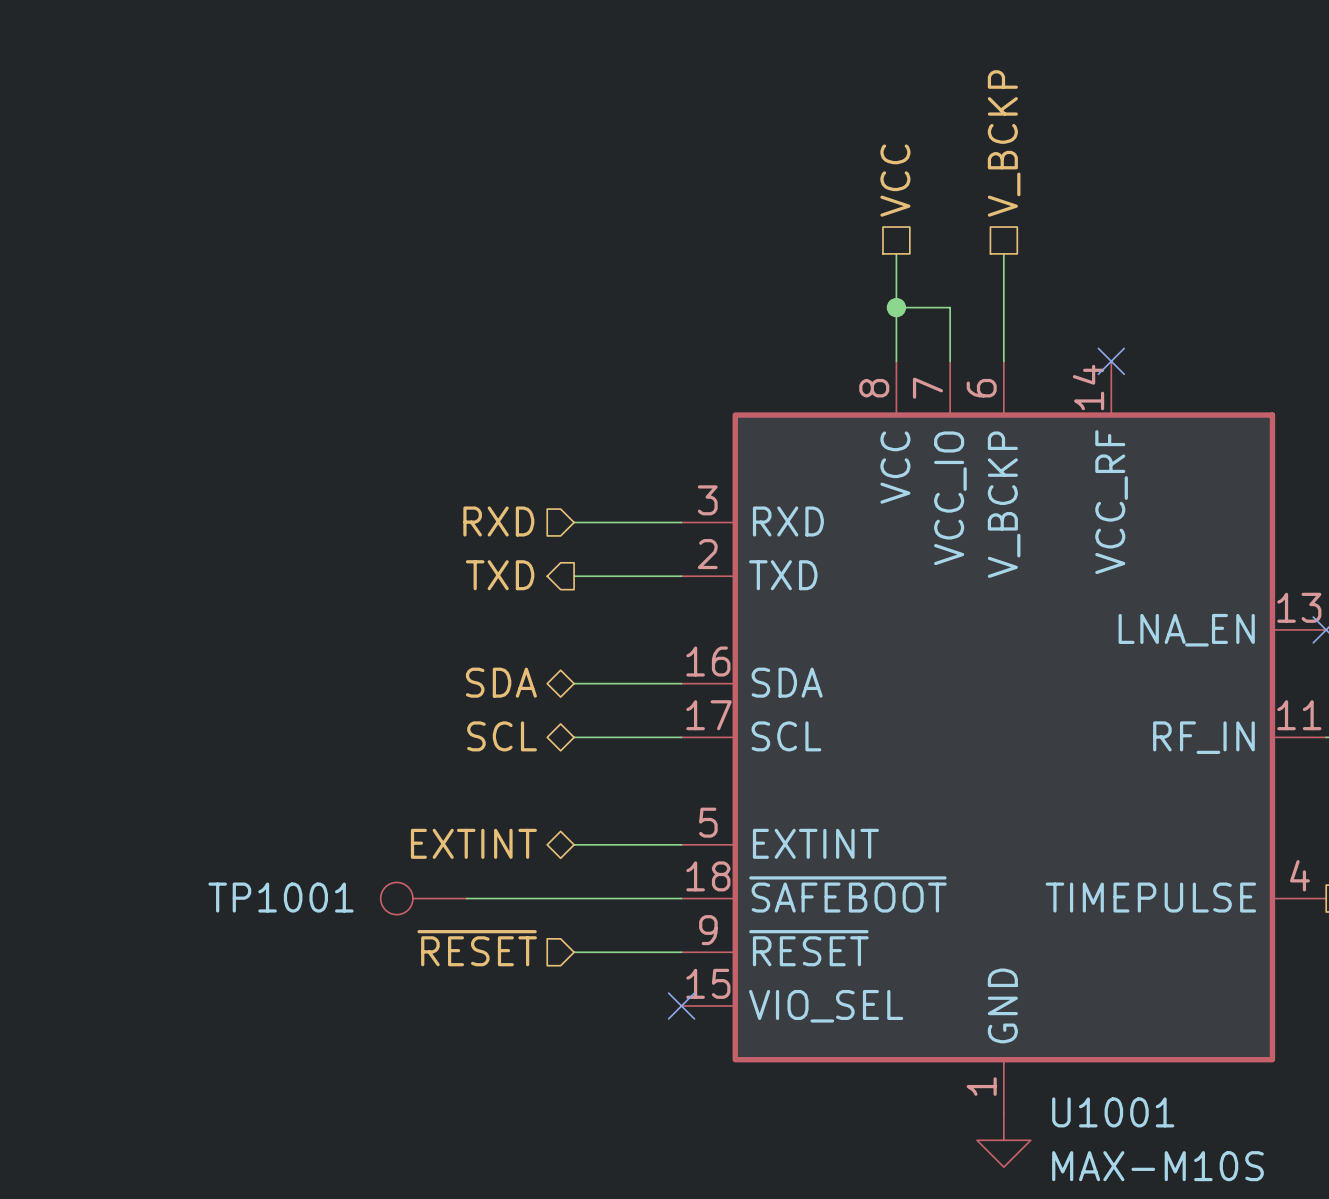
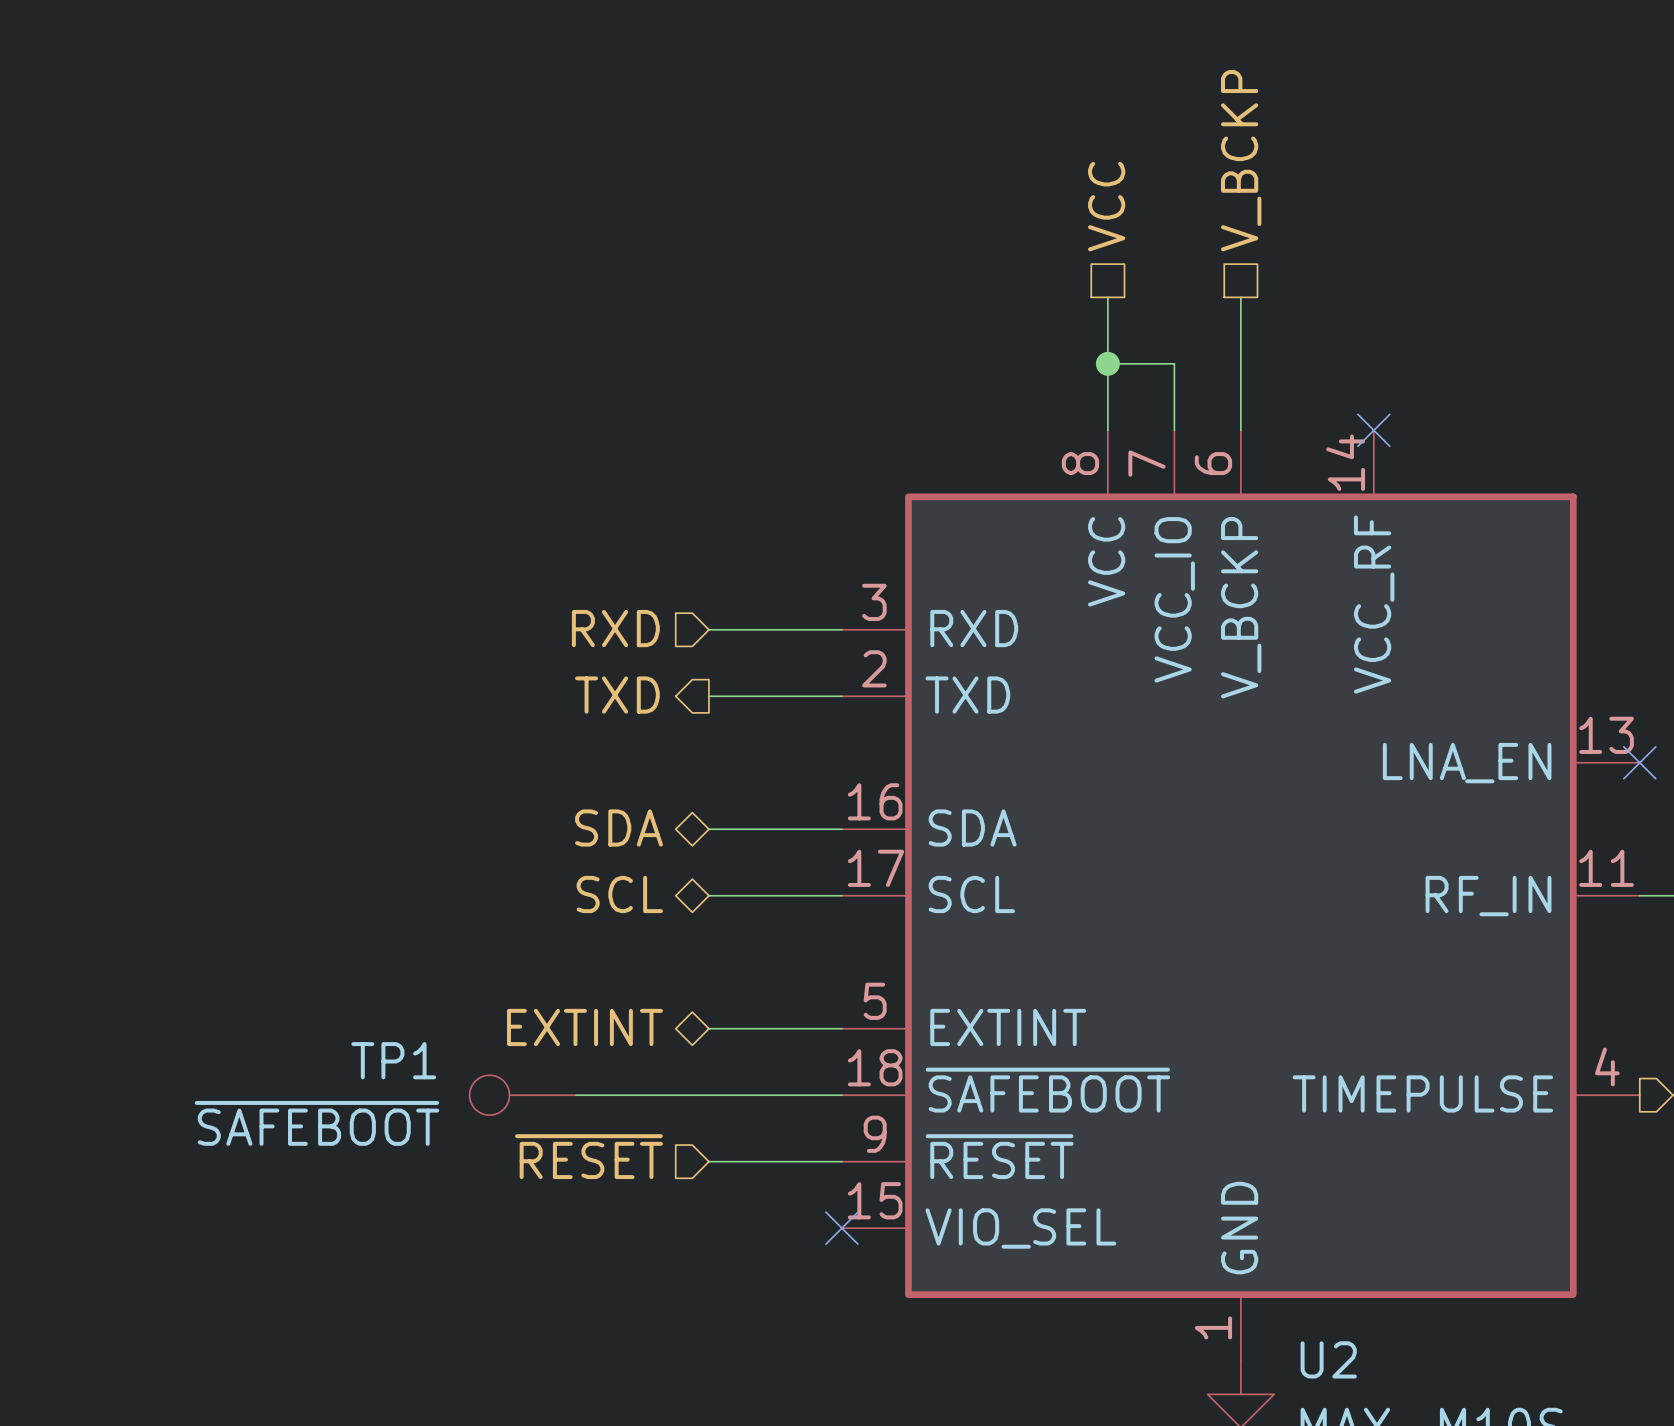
TP1001 name: TP1001 (280, 897) -> TP1 (393, 1060)
TP1001 value: none -> ~{SAFEBOOT} (317, 1123)
U1001 name: U1001 (1113, 1112) -> U2 (1328, 1359)

